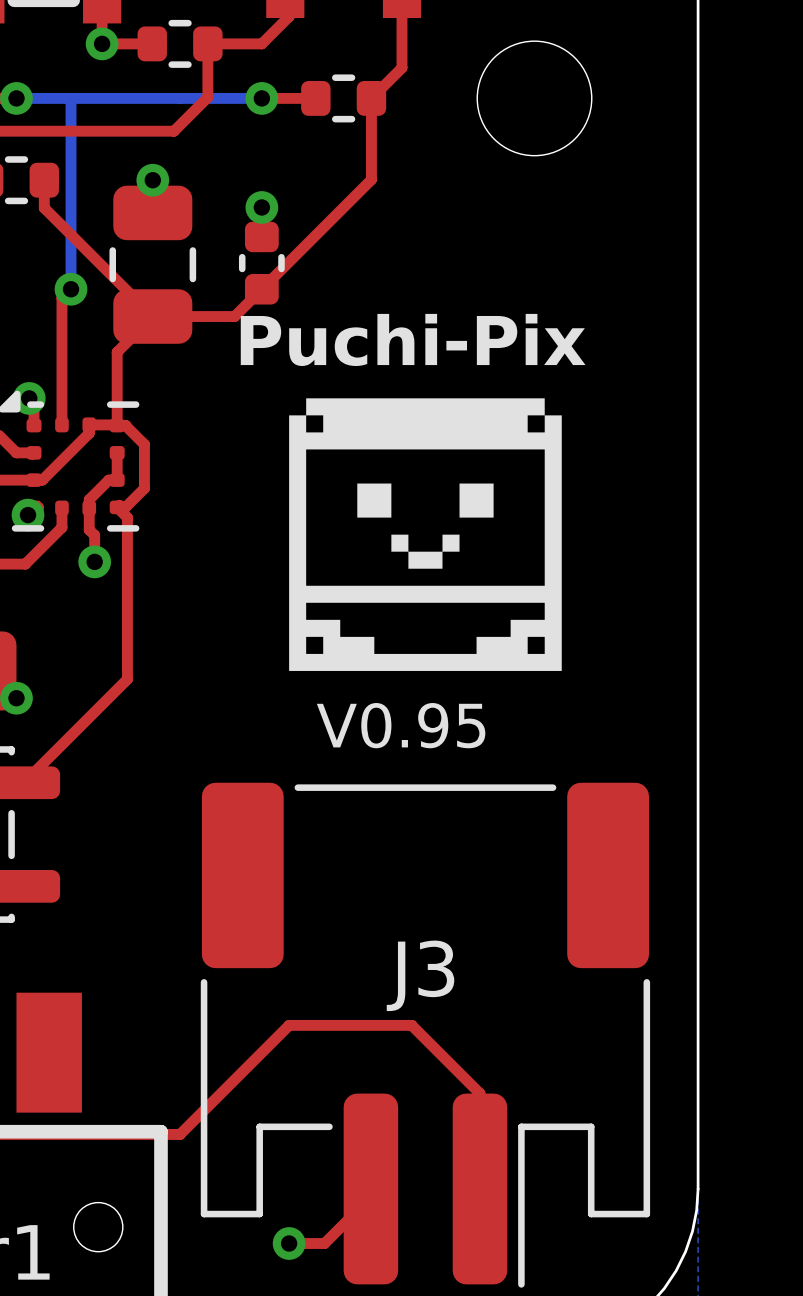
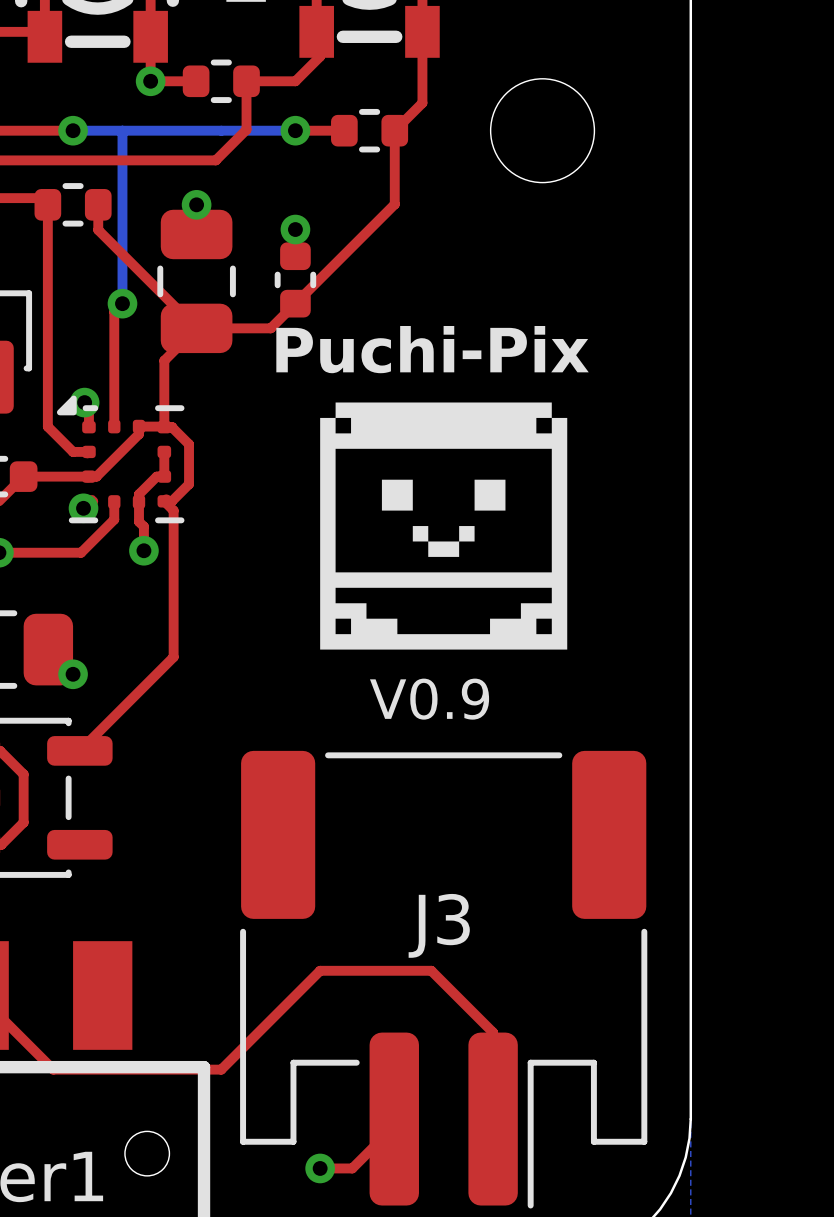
text: V0.95 (401, 725) -> V0.9 (429, 699)

